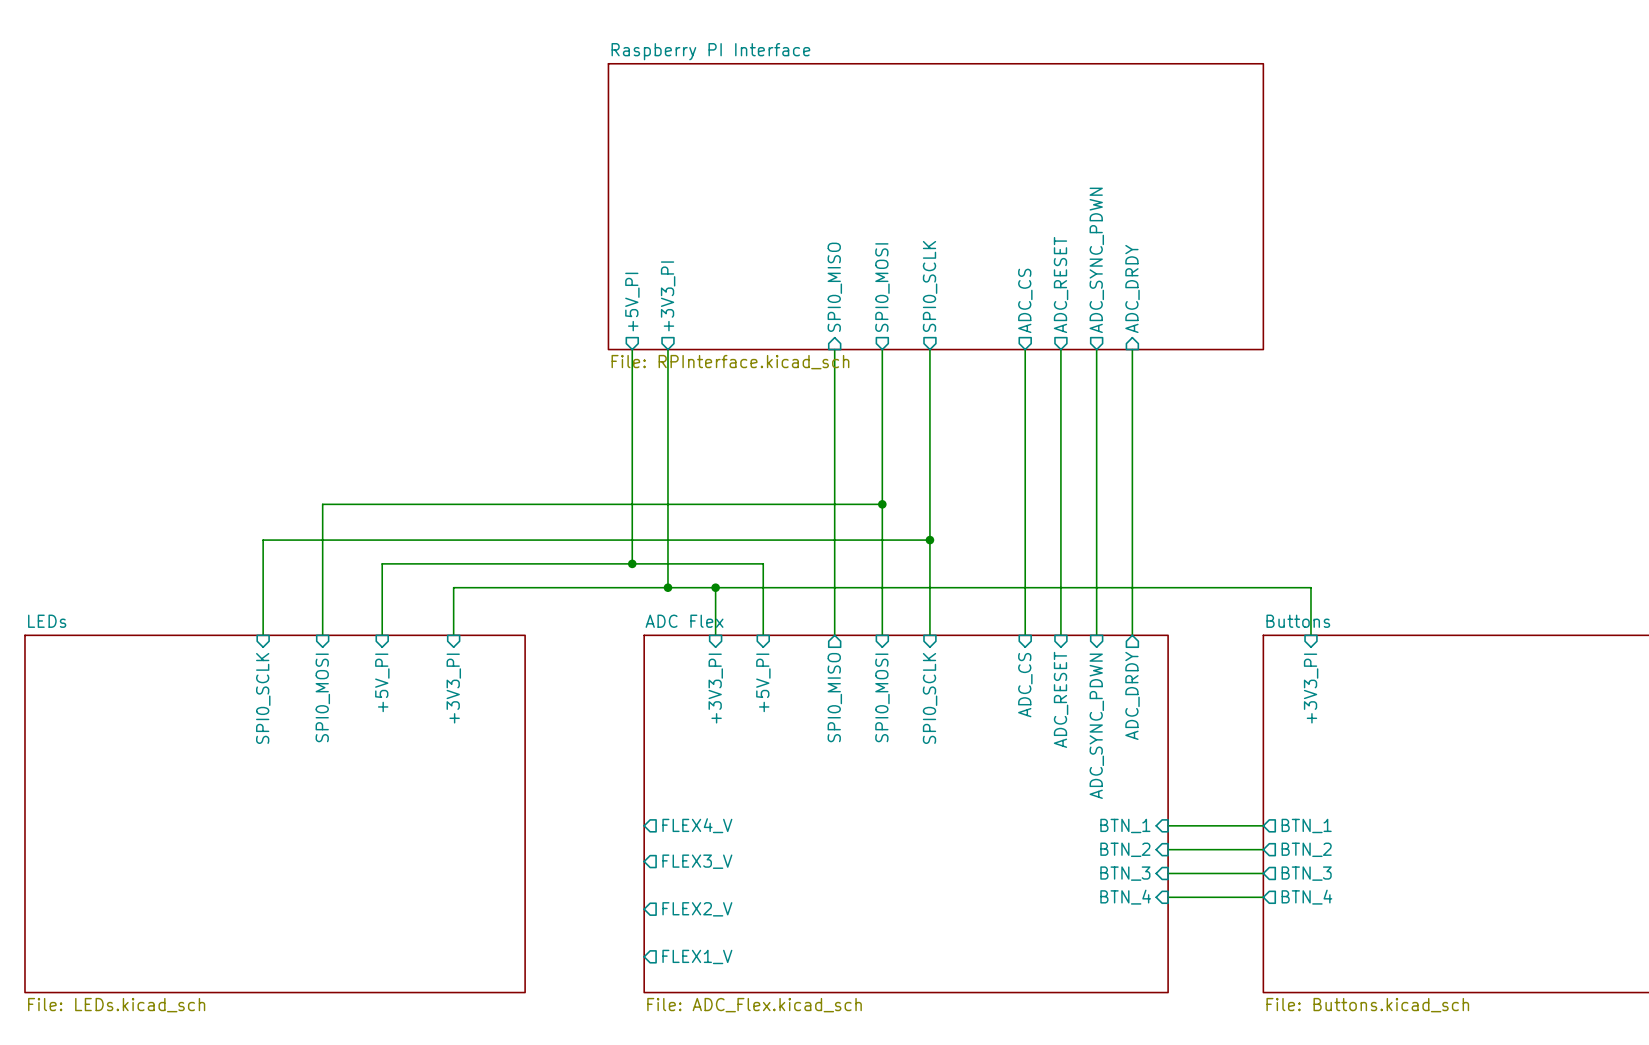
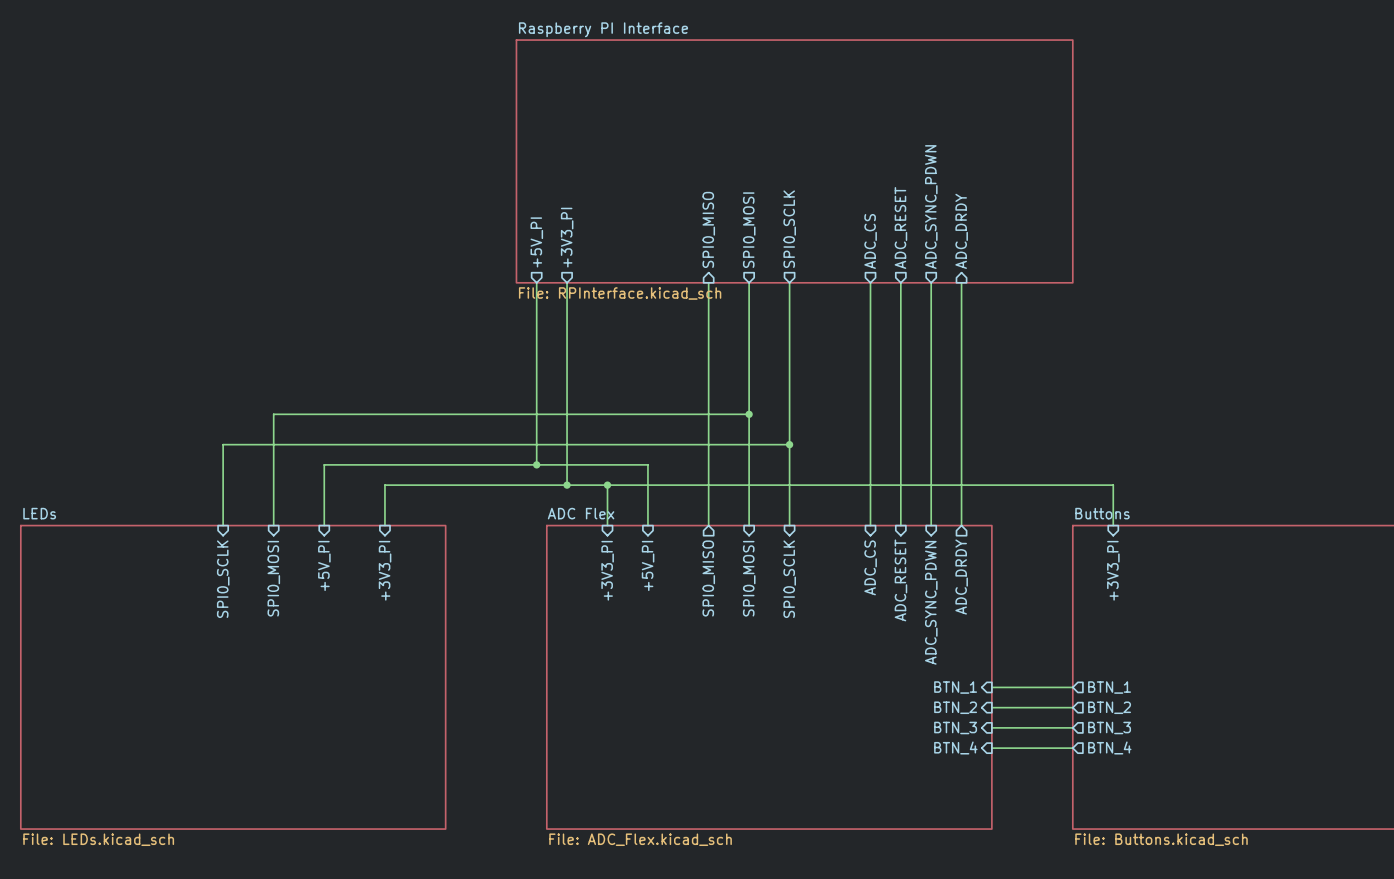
sheet pin: FLEX4_V (697, 825) -> none
sheet pin: FLEX3_V (697, 861) -> none
sheet pin: FLEX2_V (697, 909) -> none
sheet pin: FLEX1_V (697, 956) -> none

